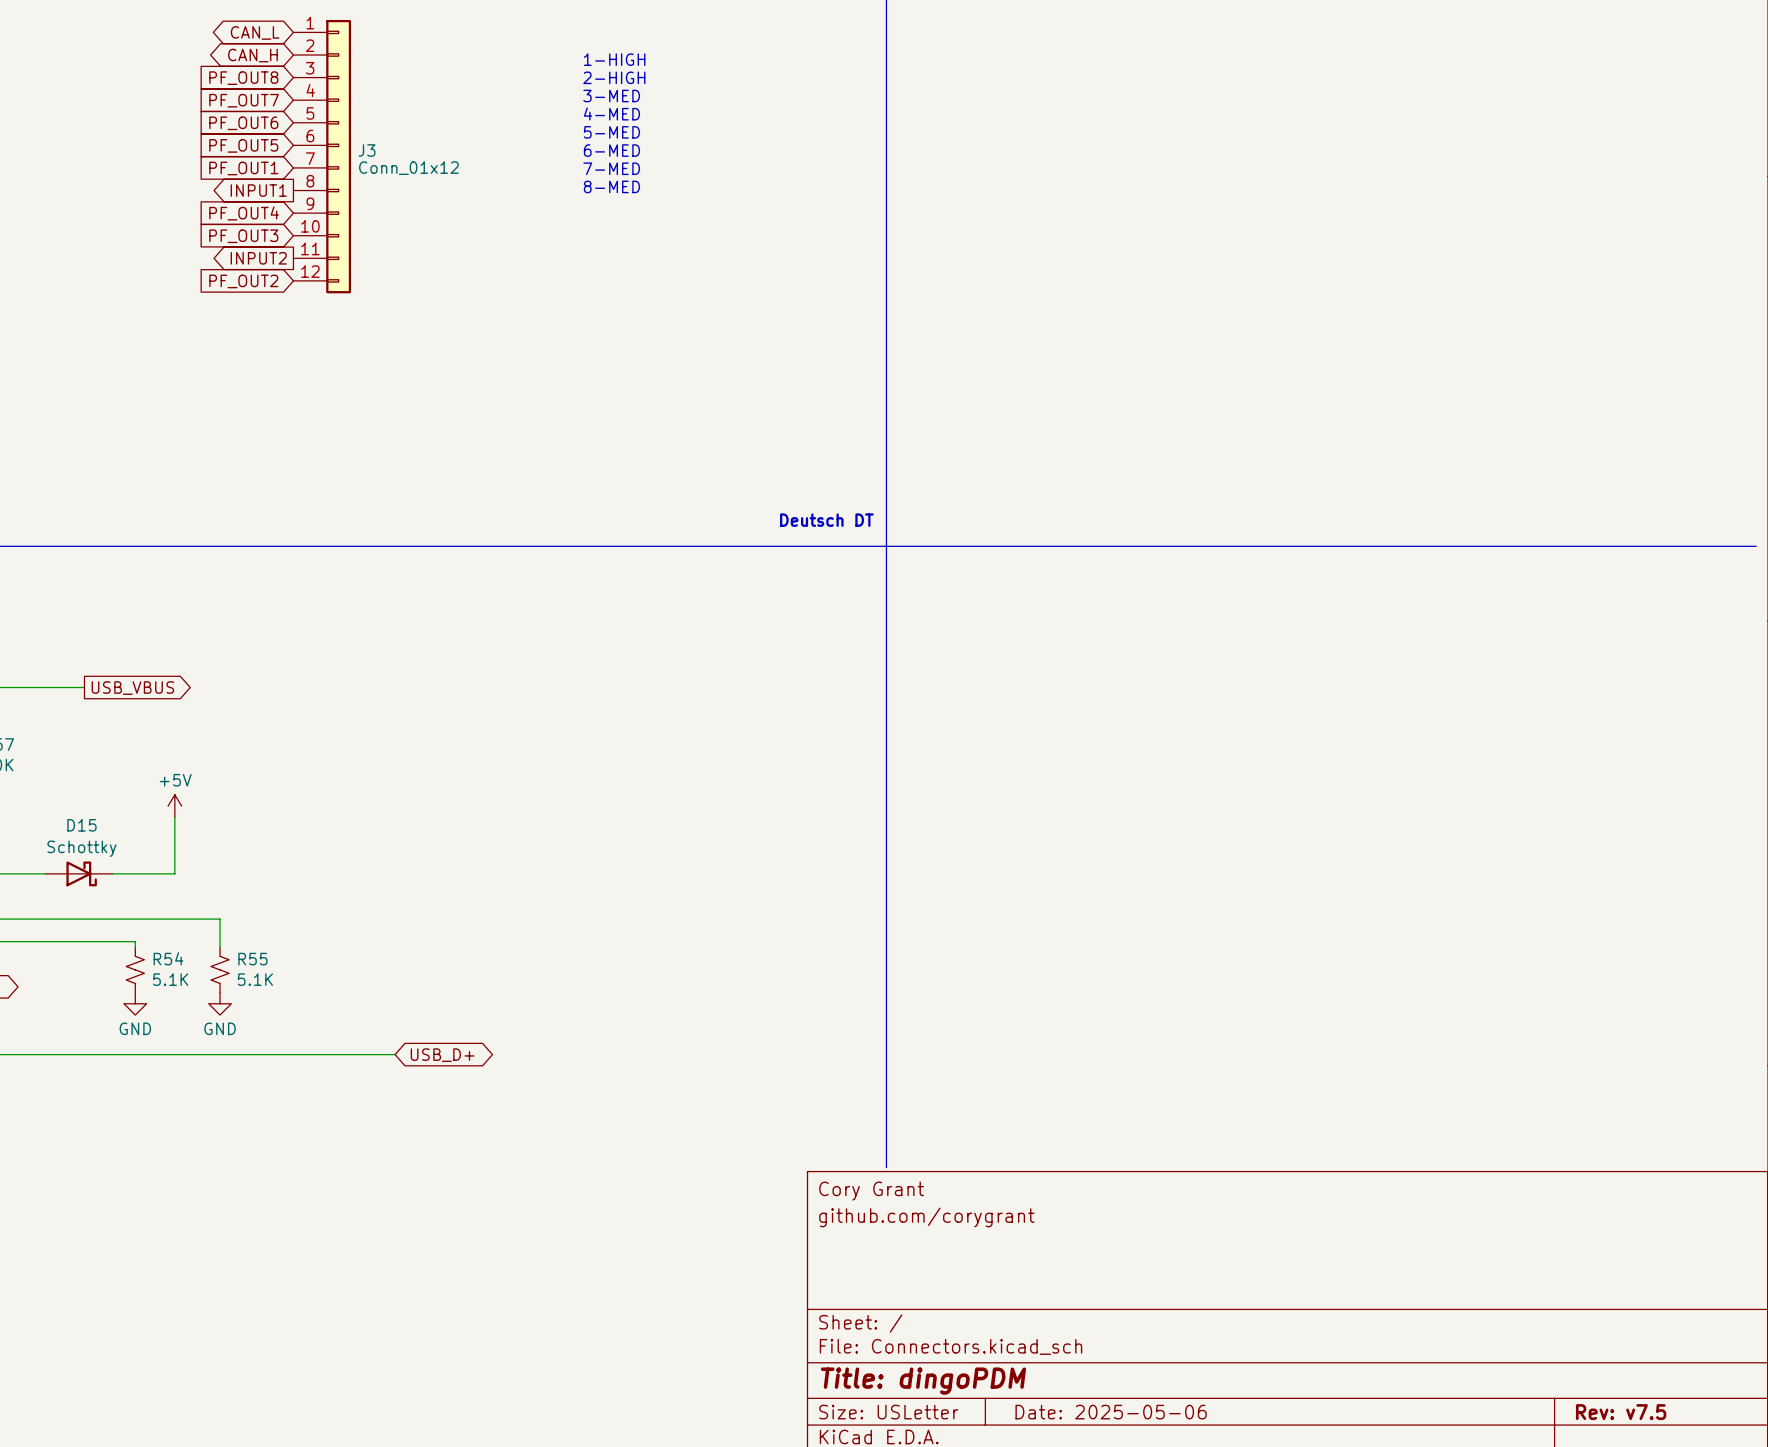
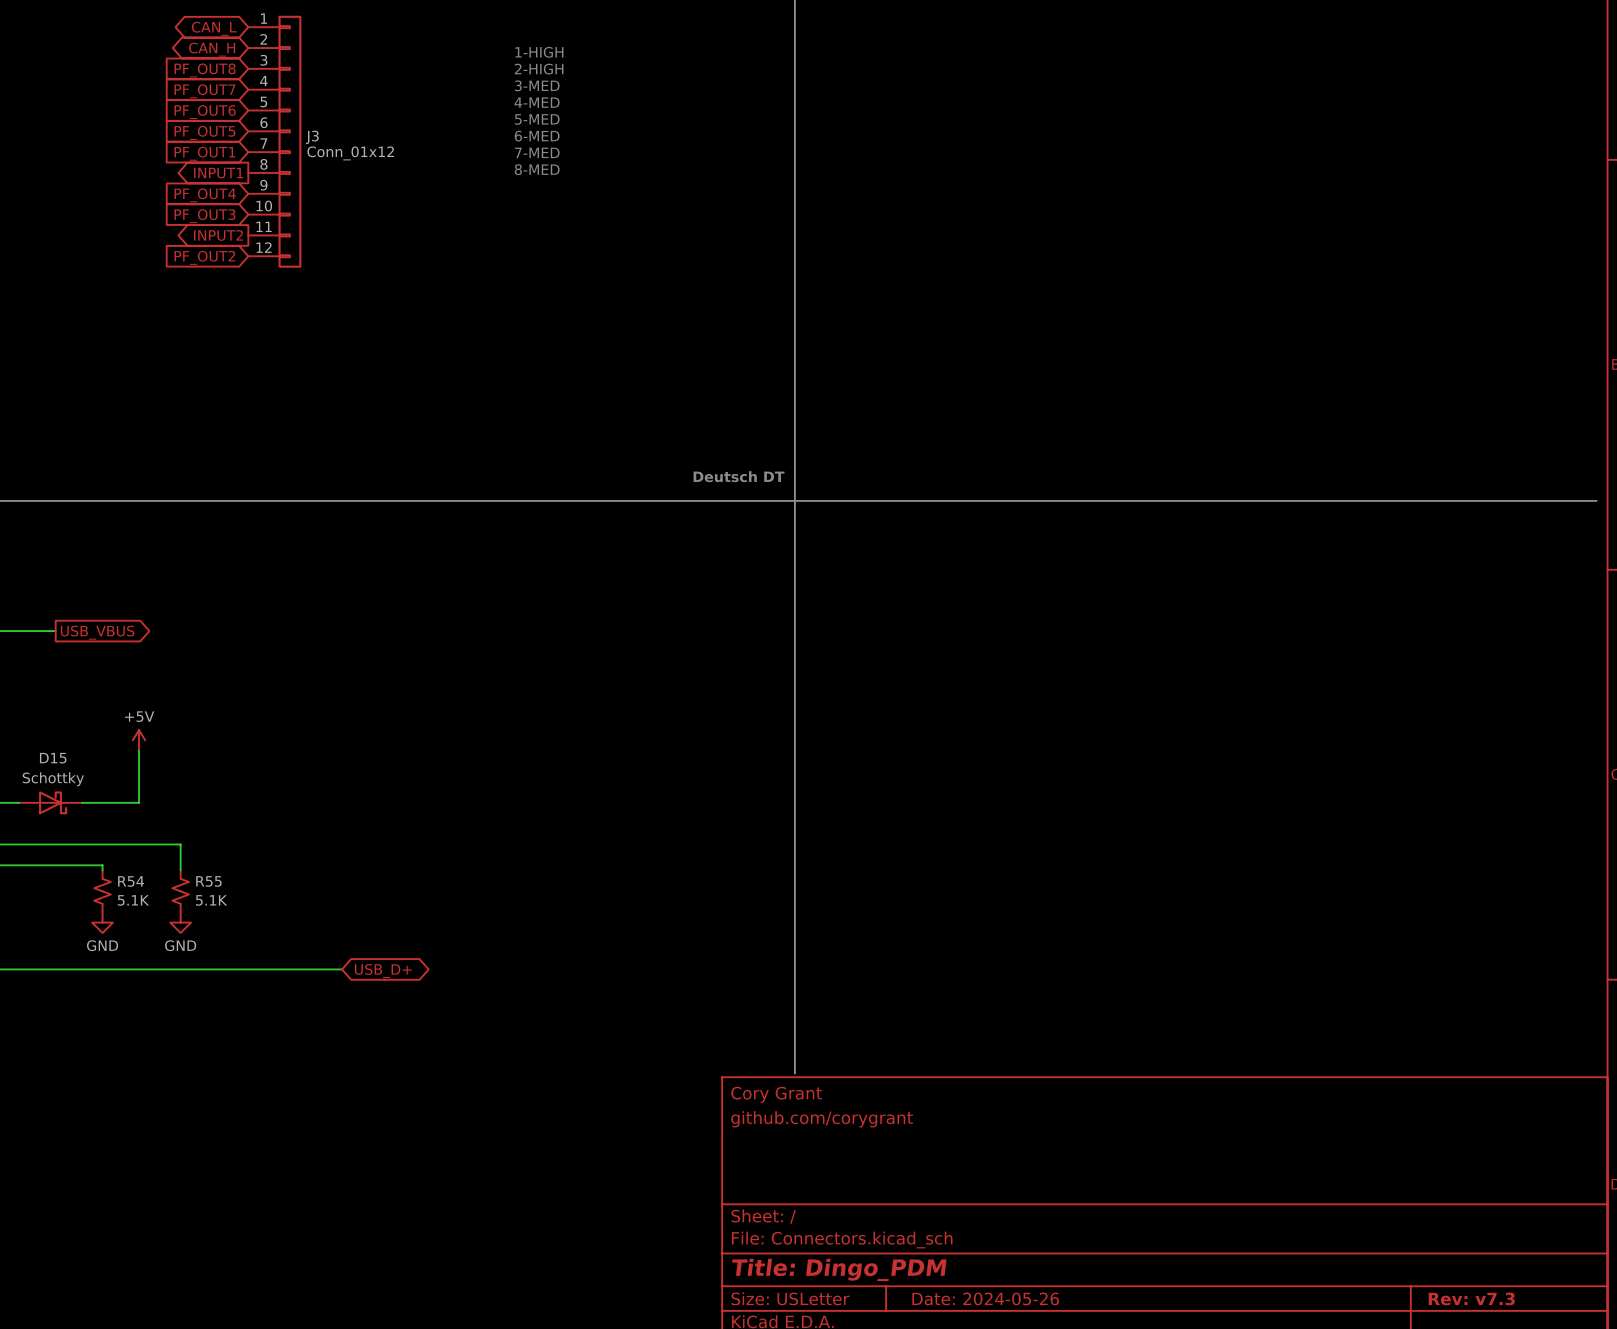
title block: Title: dingoPDM (923, 1381) -> Title: Dingo_PDM (839, 1269)
title block: Date: 2025-05-06 (1111, 1412) -> Date: 2024-05-26 (985, 1298)
title block: Rev: v7.5 (1621, 1412) -> Rev: v7.3 (1471, 1298)

